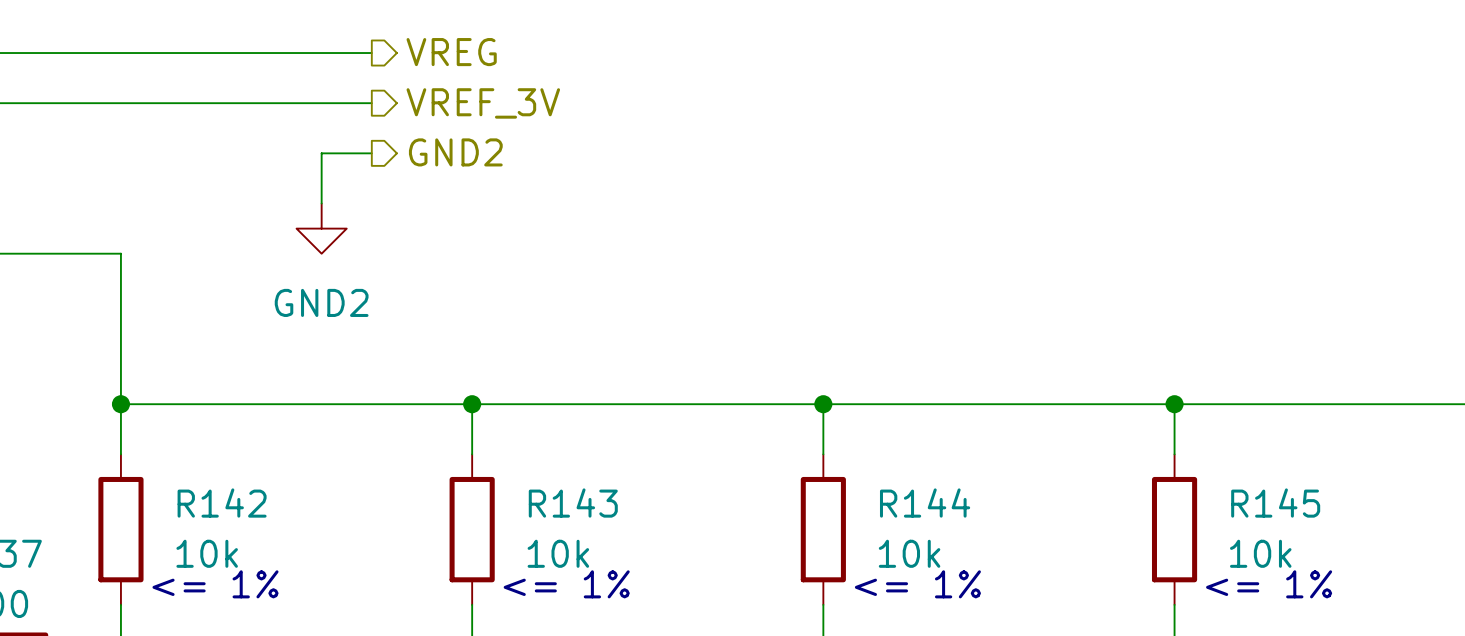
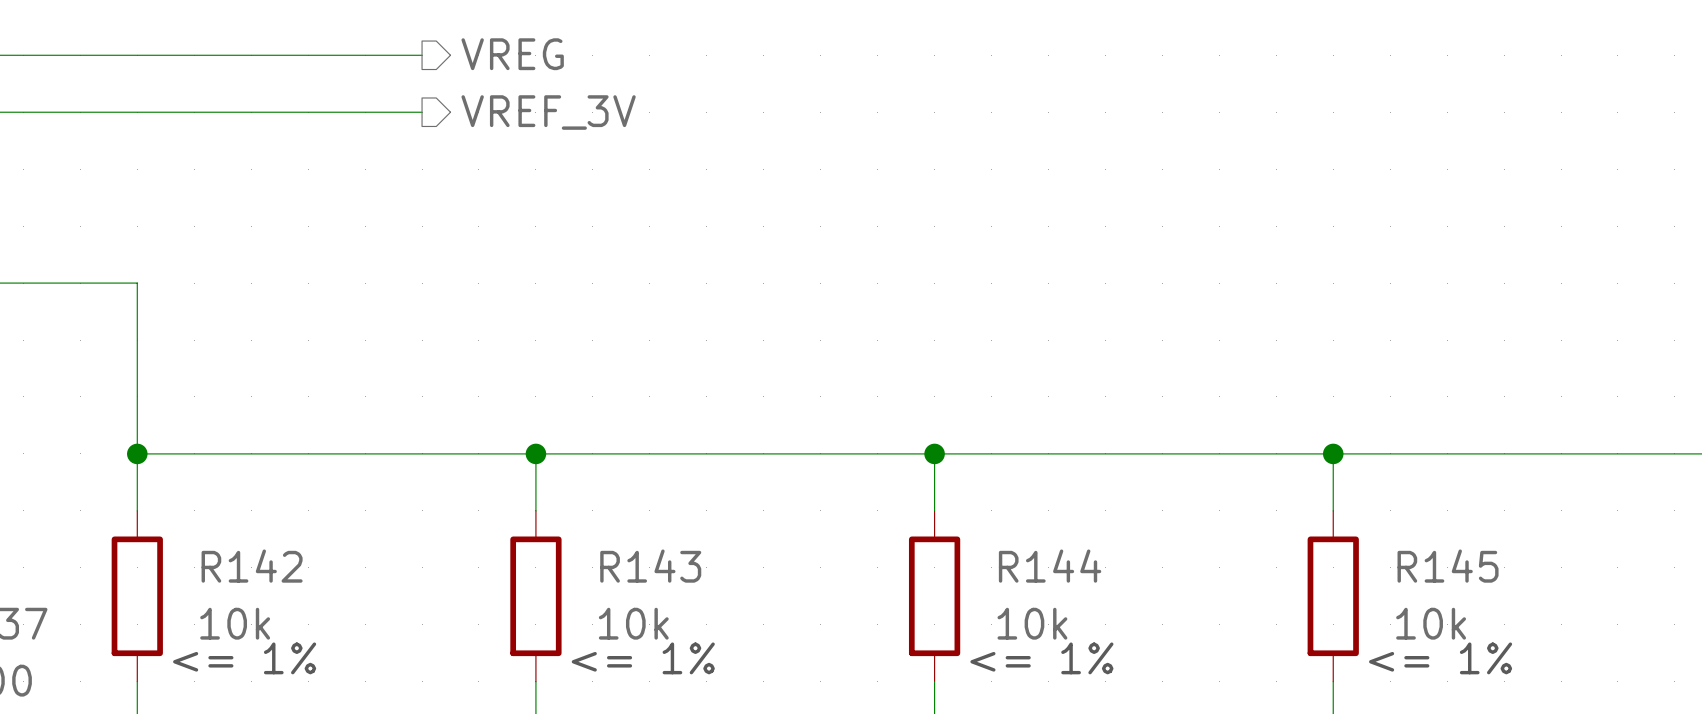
hierarchical label: GND2 (455, 152) -> none
wire: (371, 153) (321, 153) (321, 203) -> none
power symbol: GND2 (321, 228) -> none

